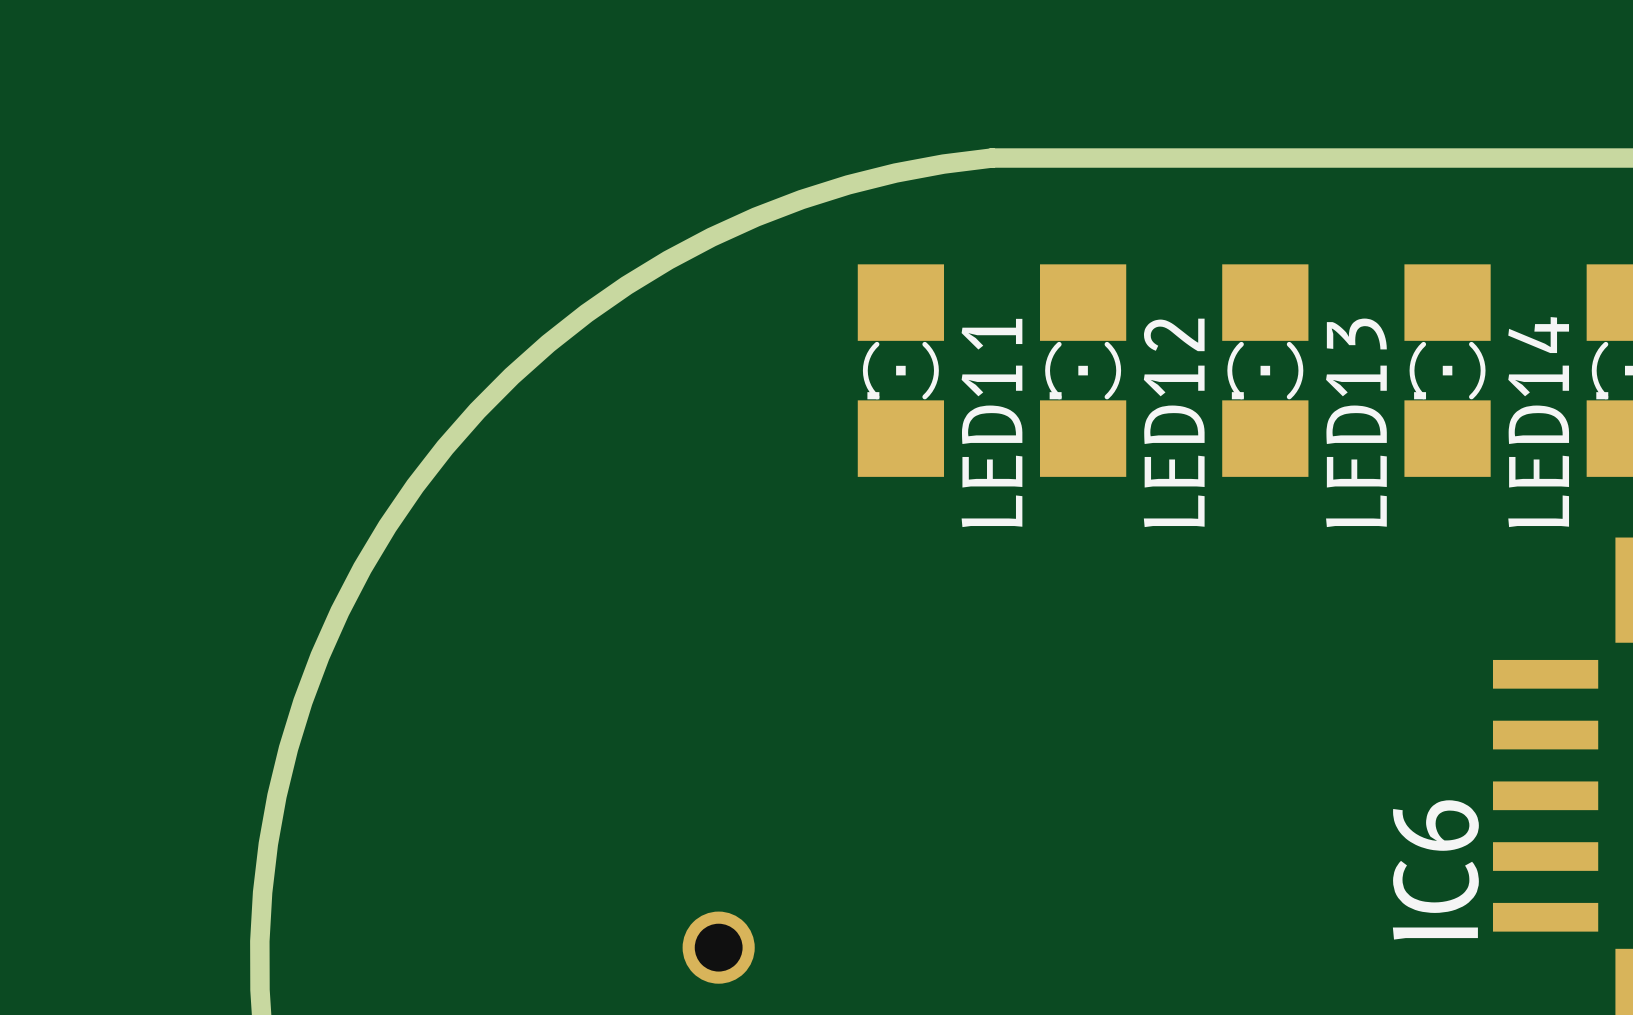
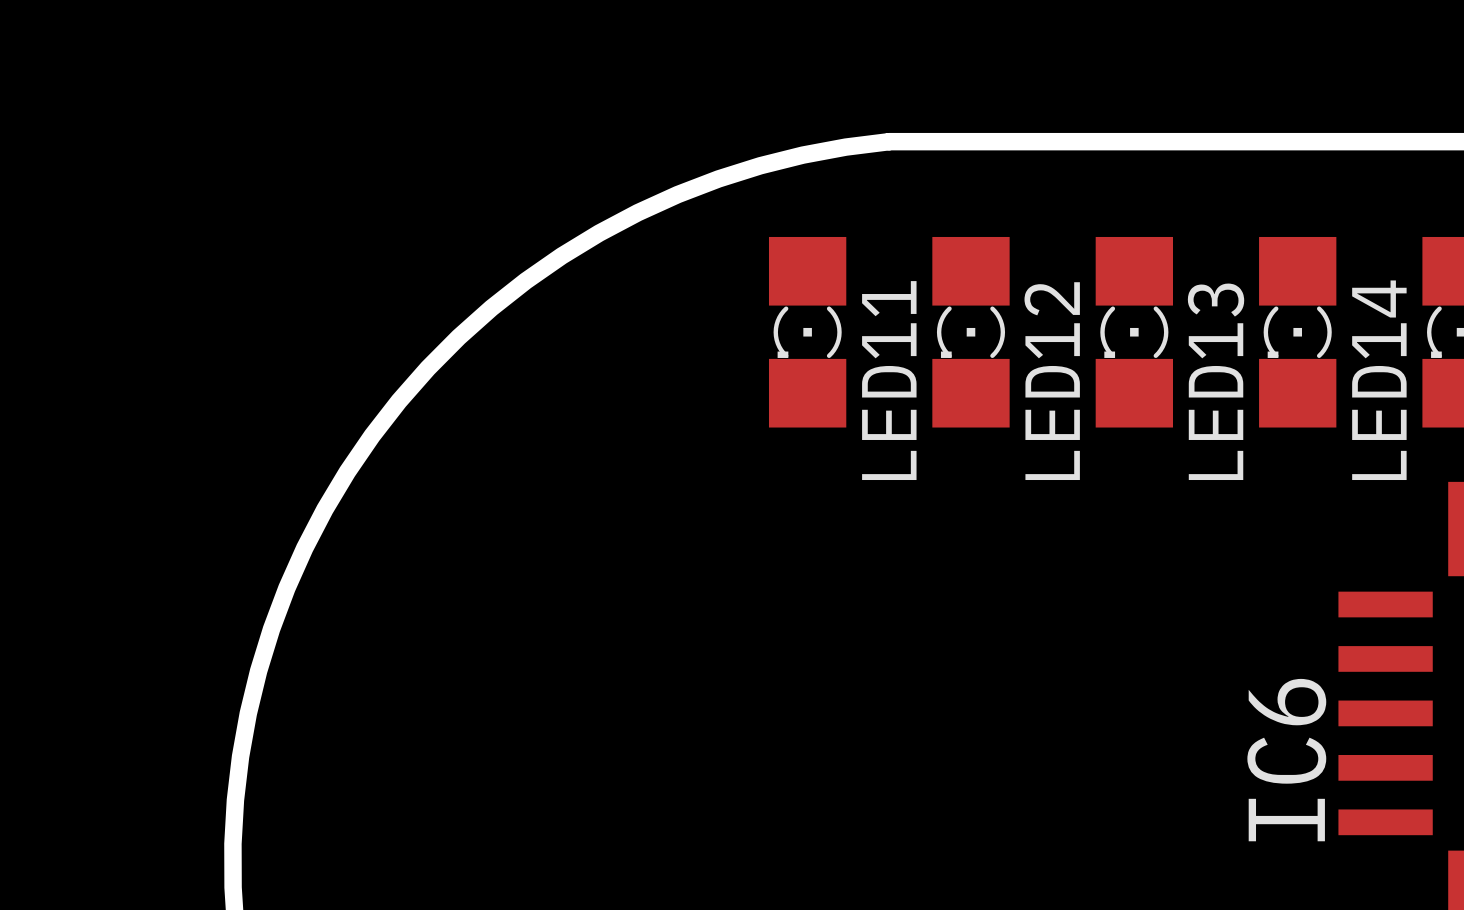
part: (718, 947) -> none

